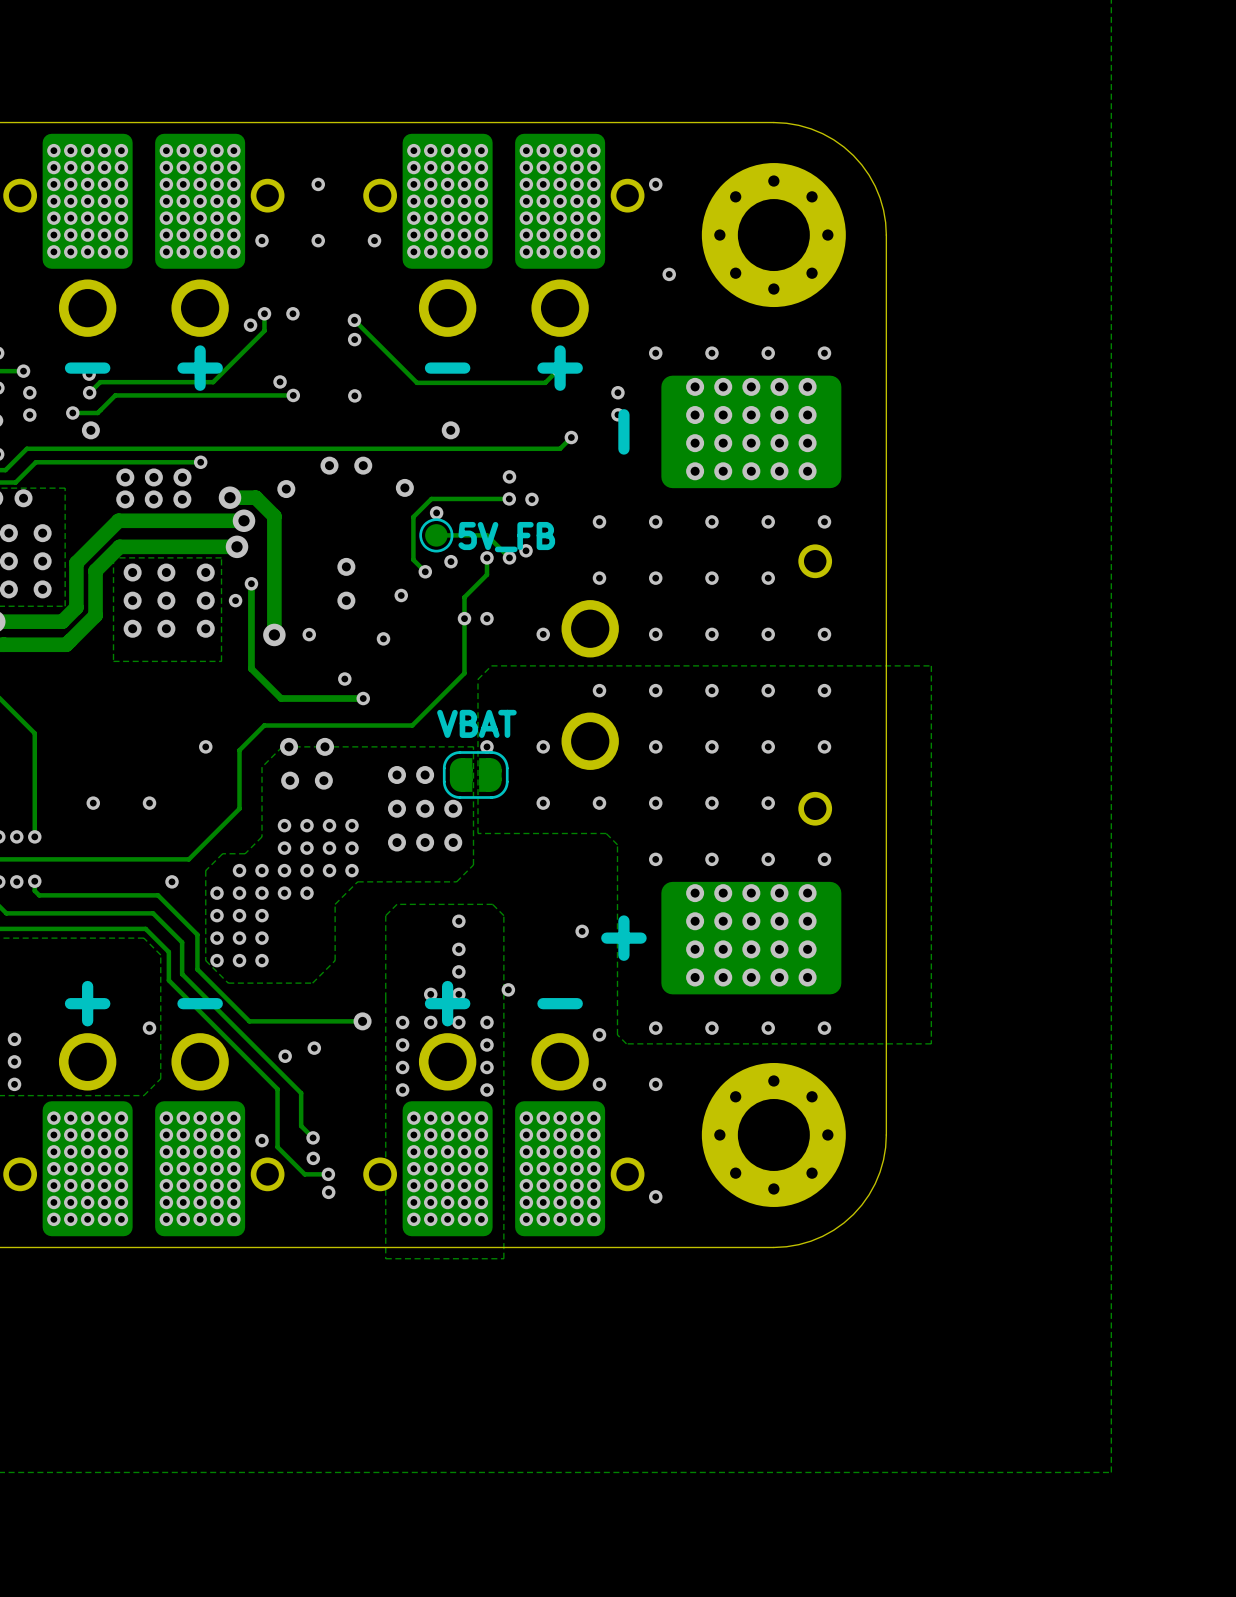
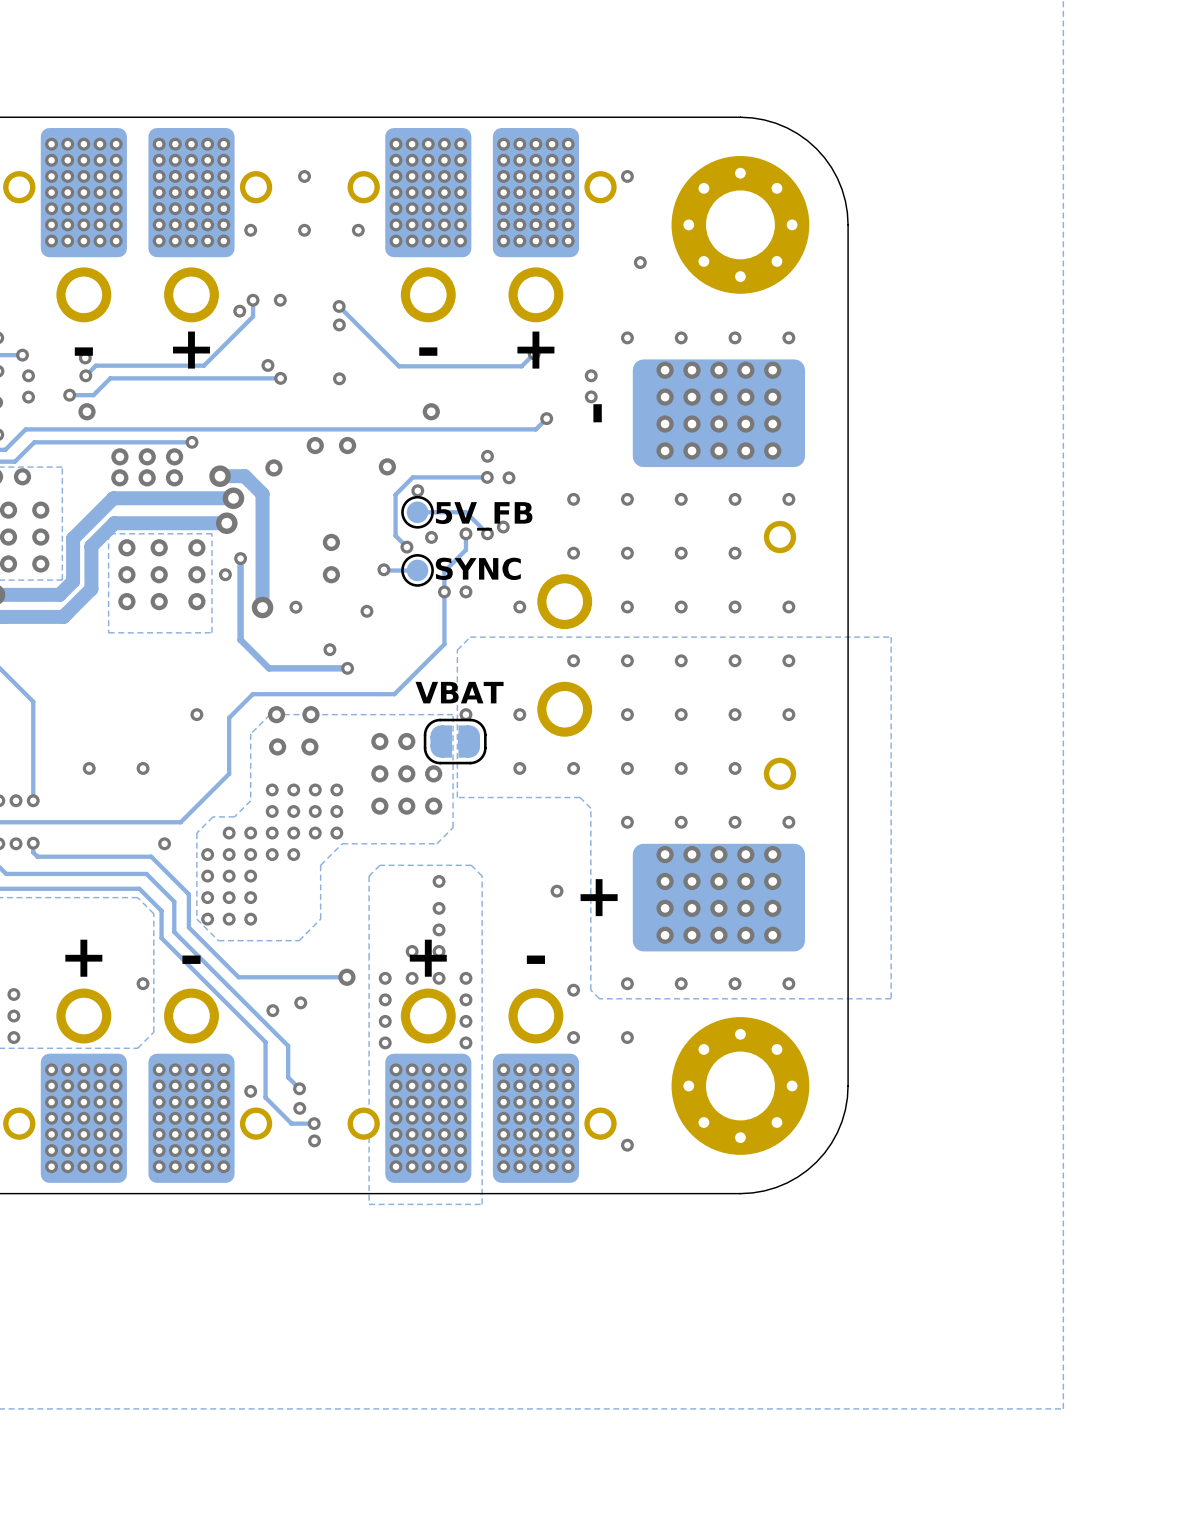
text: none -> SYNC (478, 568)
track: none -> (417, 570) (384, 570)
part: none -> (417, 570)
via: (508, 989) -> none

